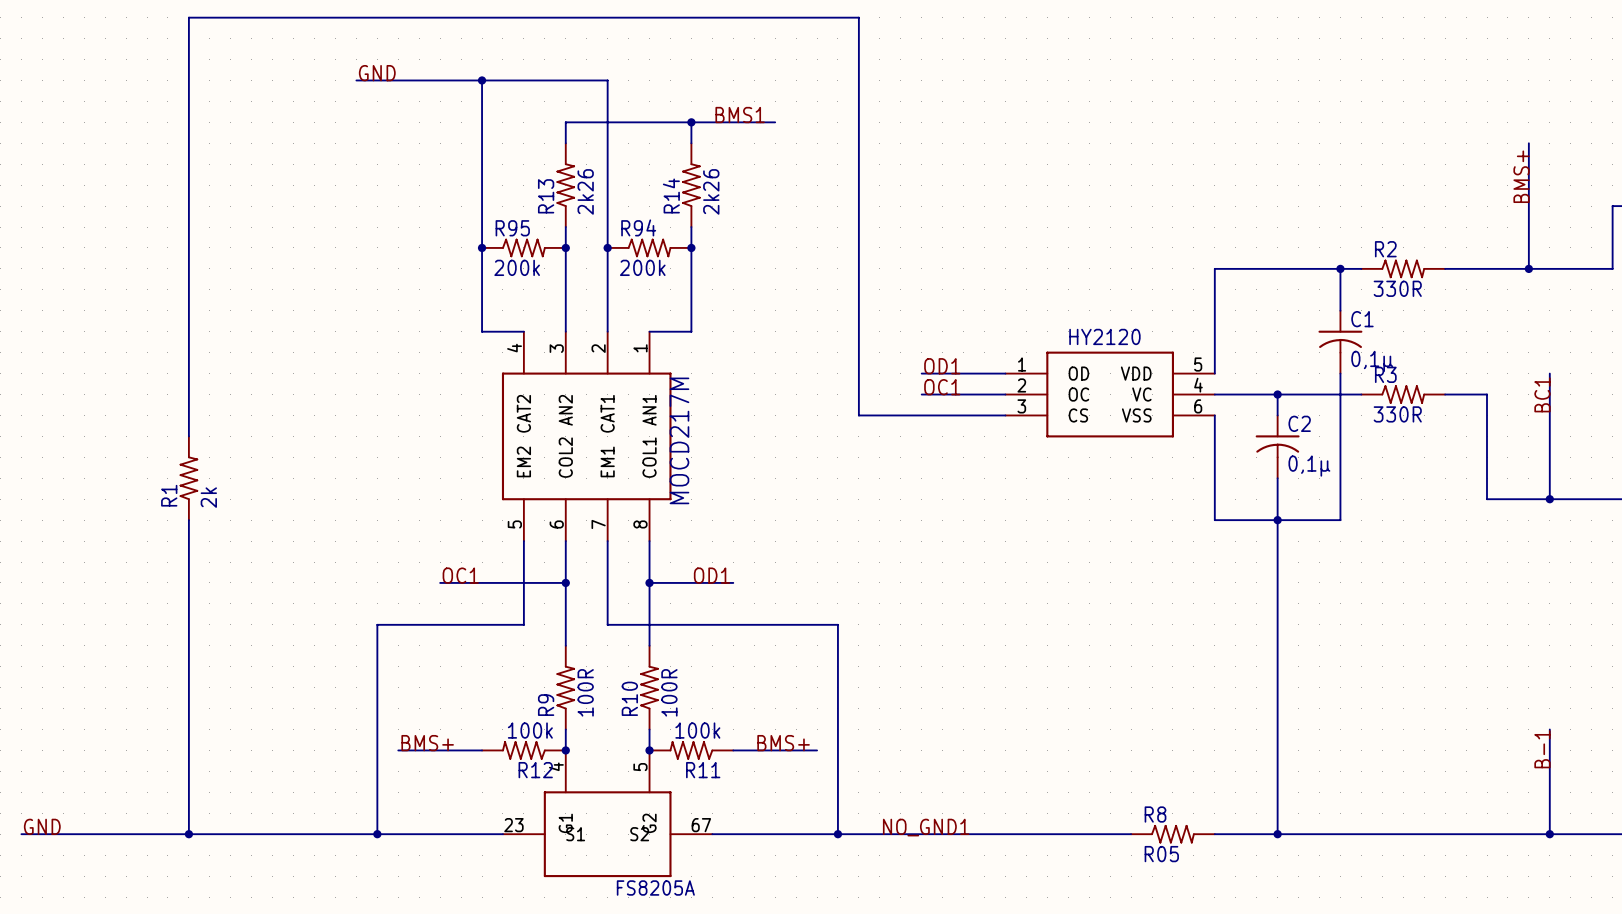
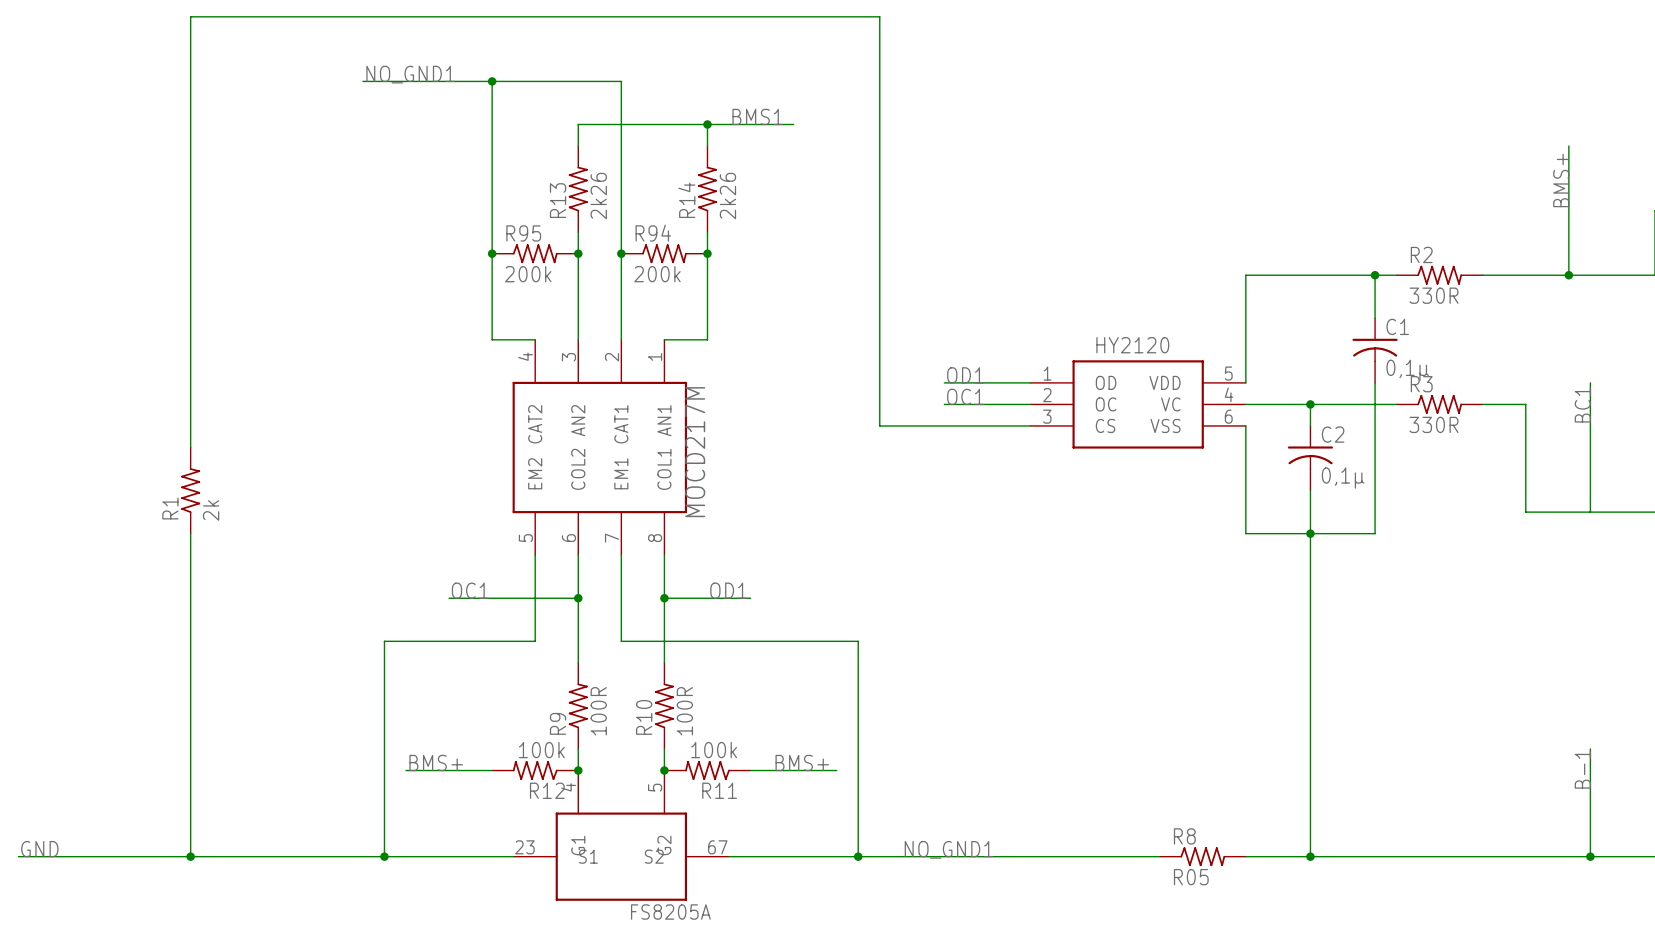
label: GND (377, 73) -> NO_GND1 (410, 74)
junction: (1549, 499) -> none

